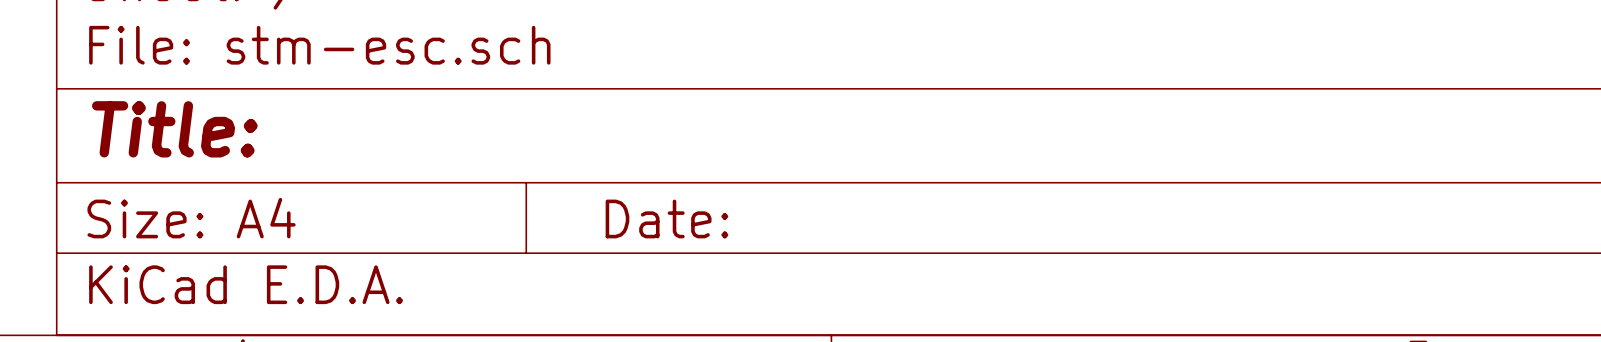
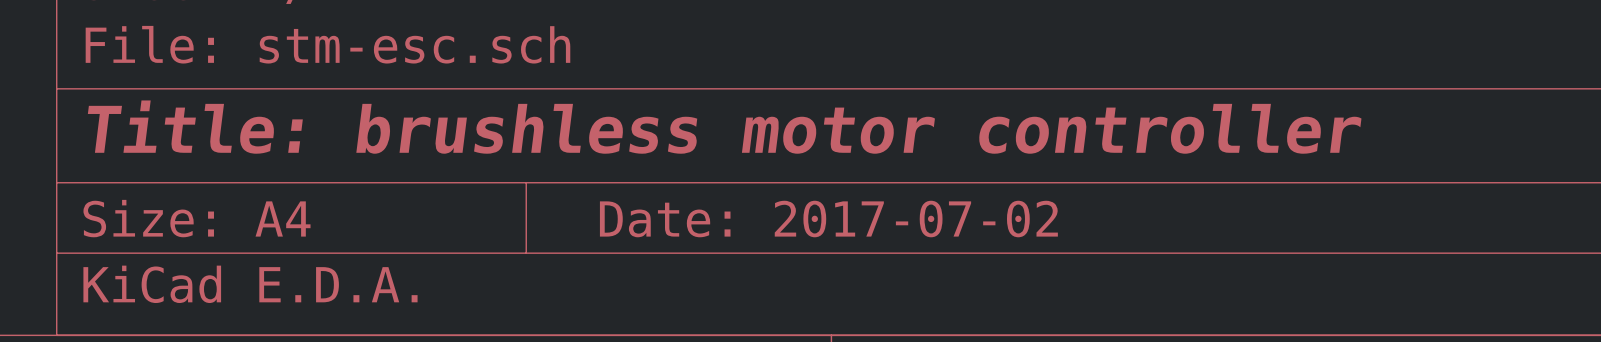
title block: Title: (174, 129) -> Title: brushless motor controller (724, 127)
title block: Date: (666, 218) -> Date: 2017-07-02 (828, 219)

